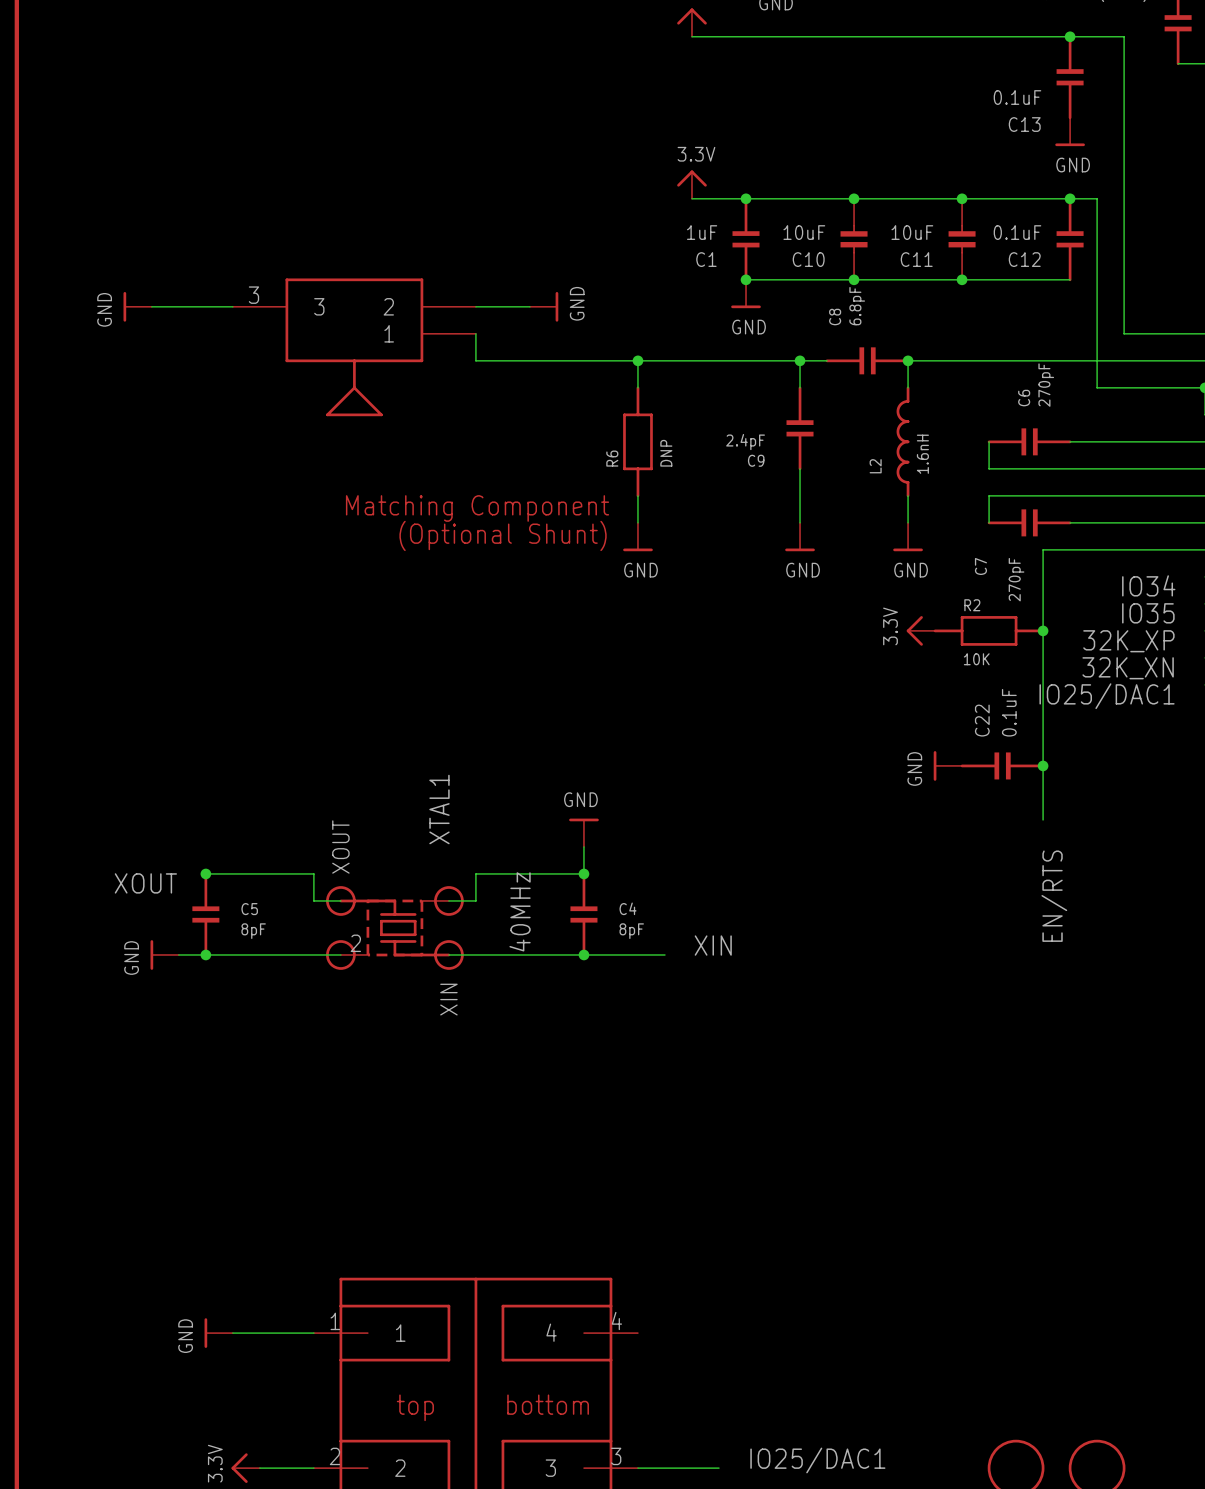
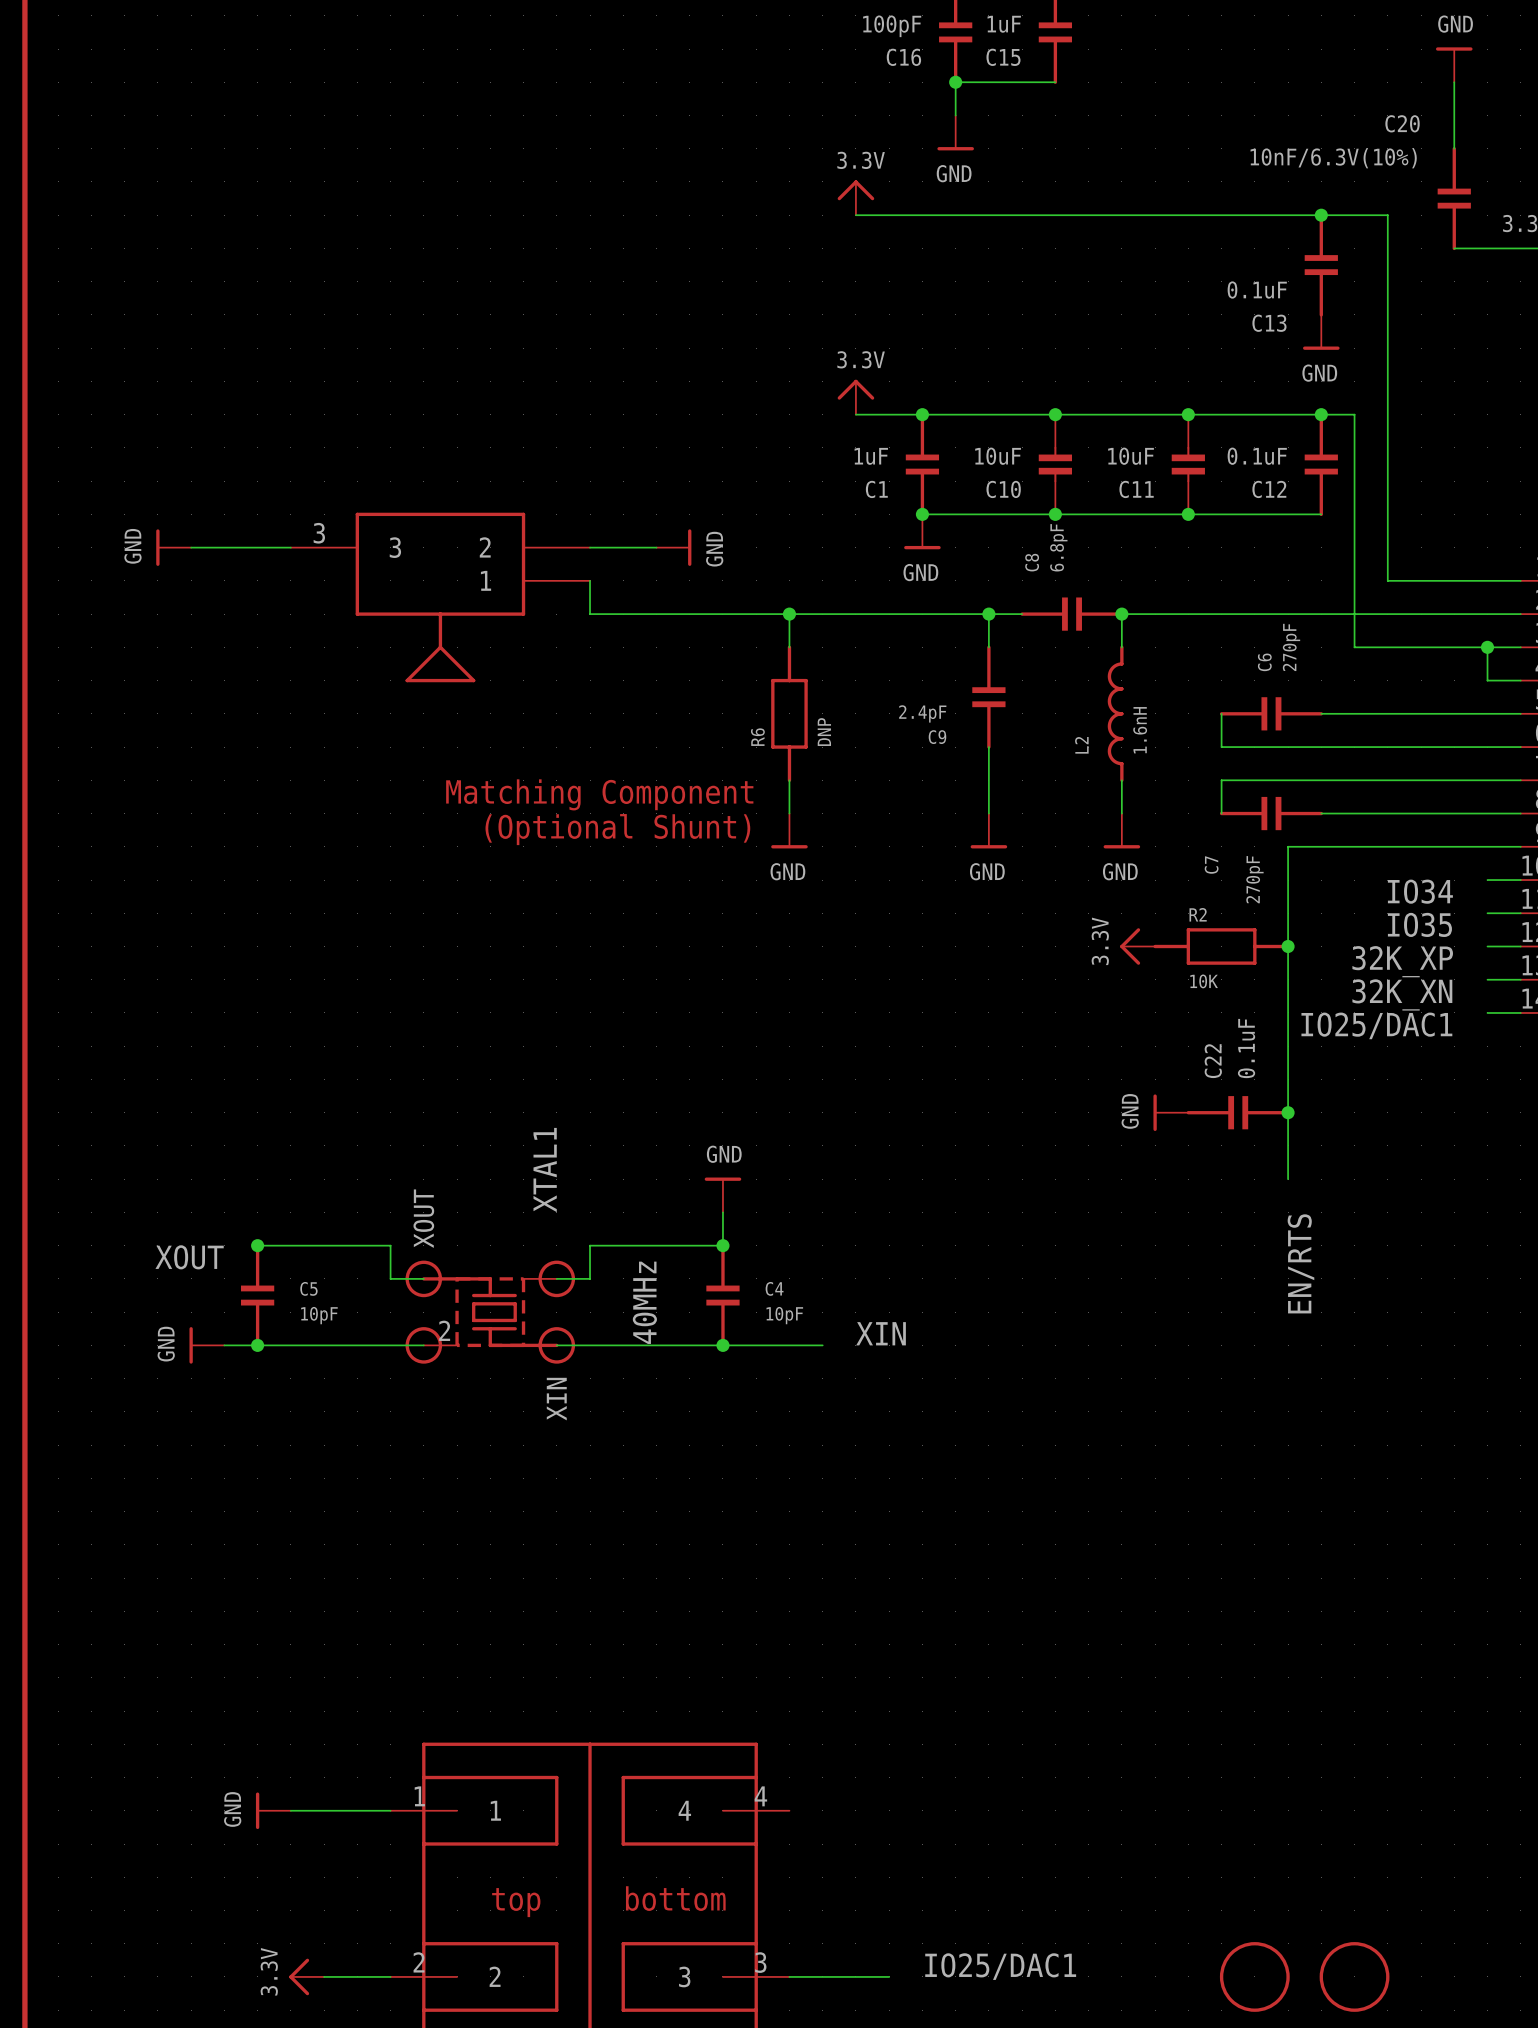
C5 value: 8pF (253, 931) -> 10pF (319, 1315)
C4 value: 8pF (631, 931) -> 10pF (784, 1315)

